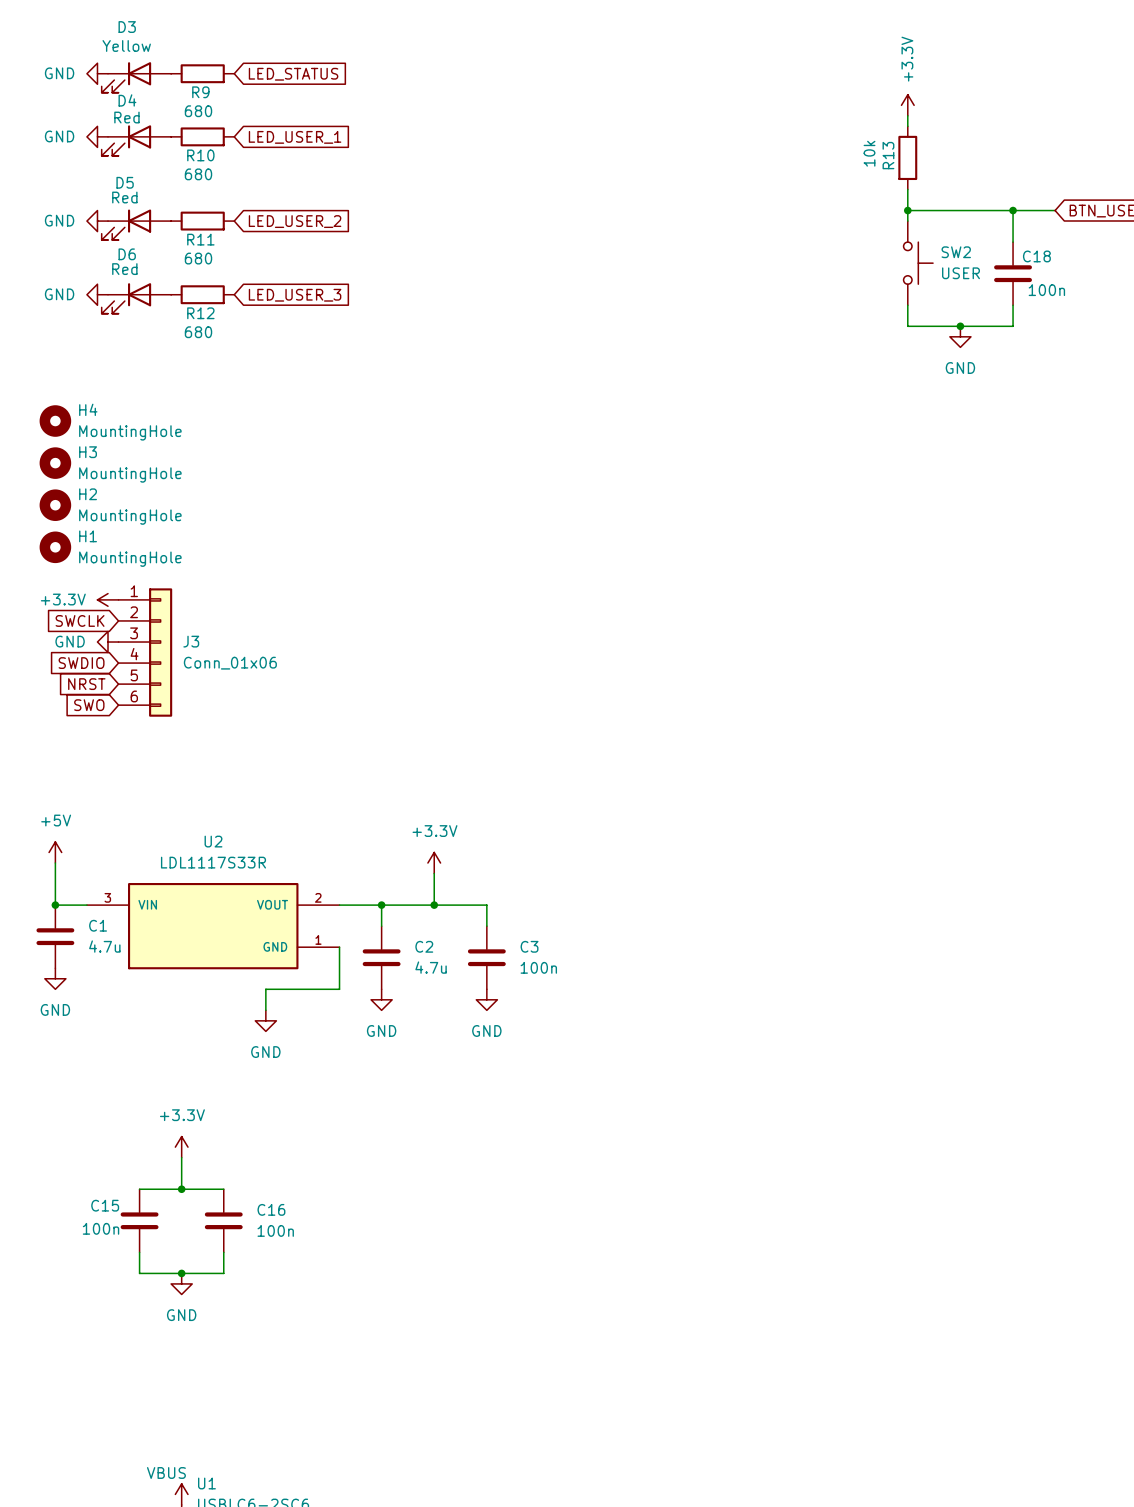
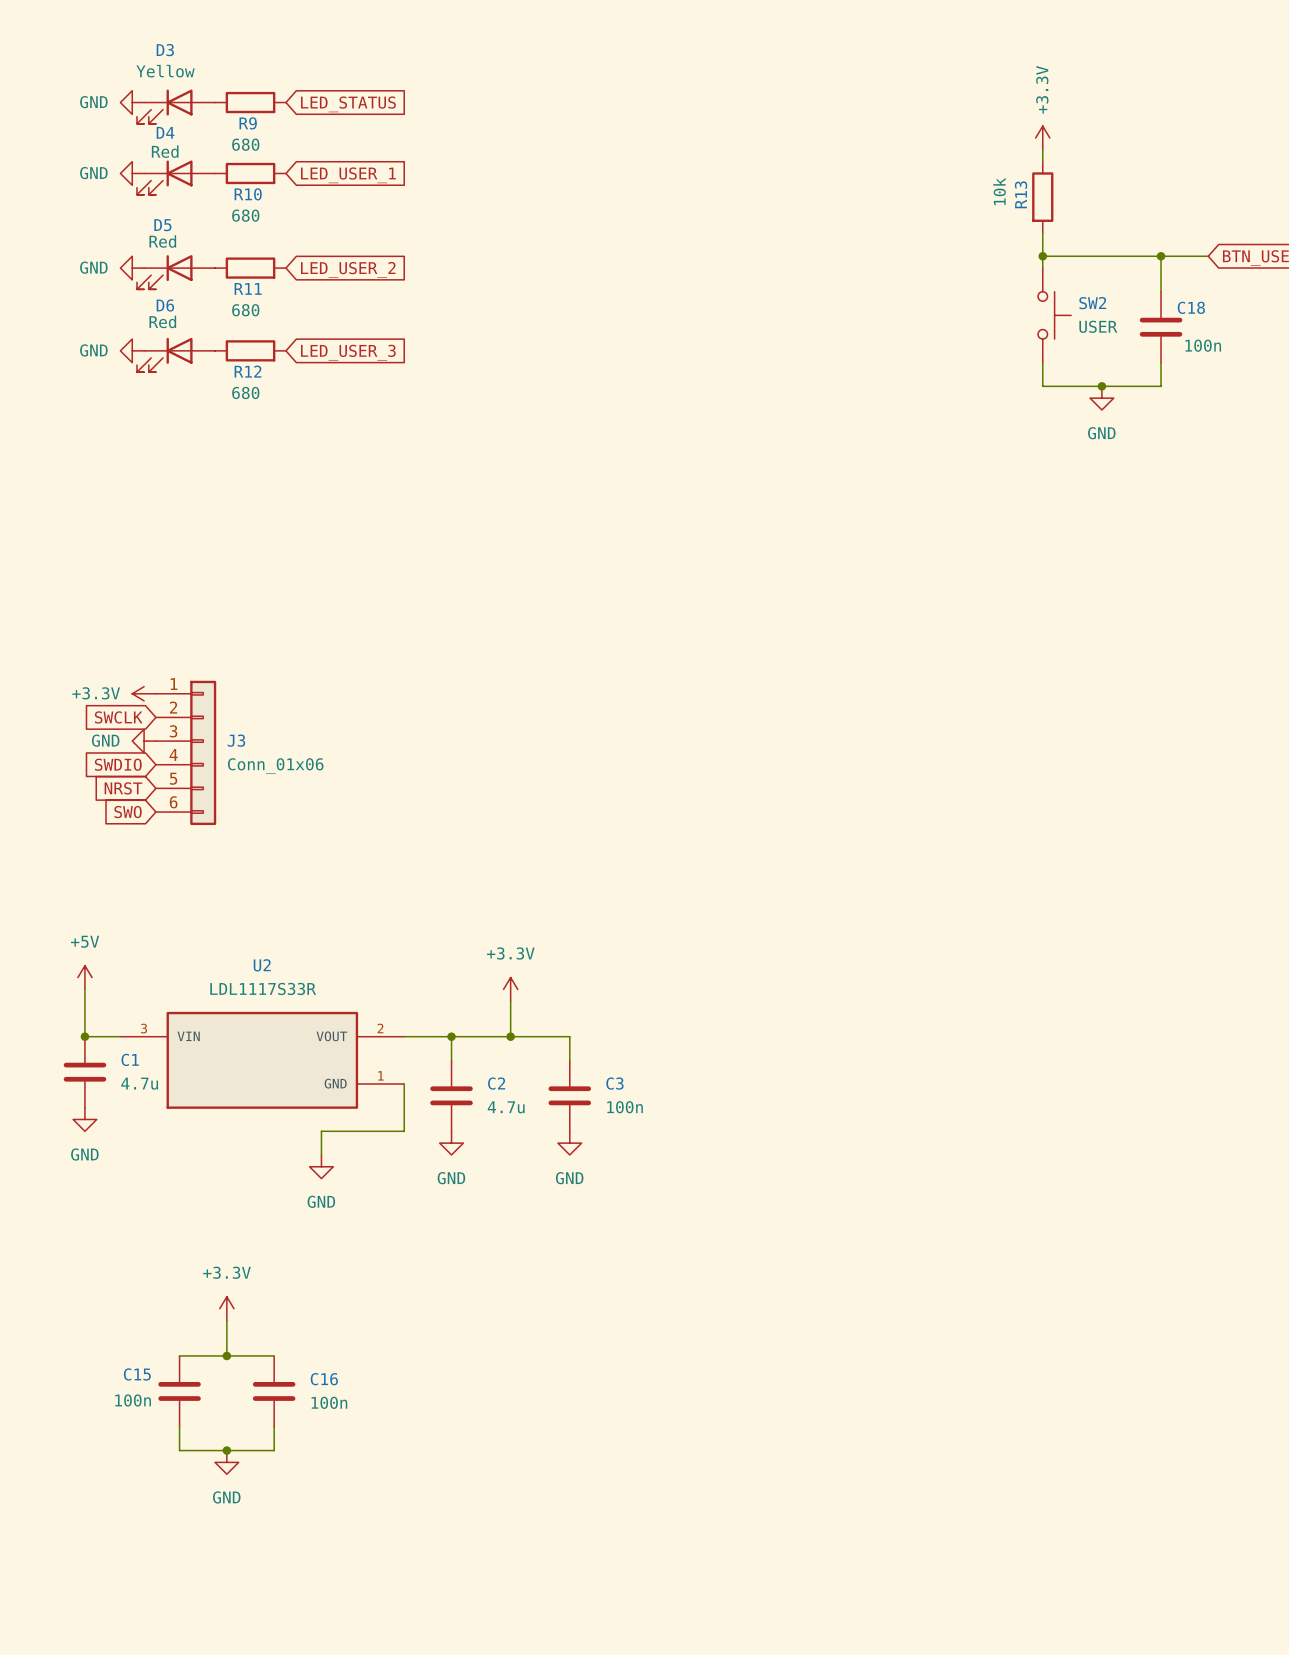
H4: MountingHole (55, 421) -> none
H3: MountingHole (55, 463) -> none
H2: MountingHole (55, 505) -> none
H1: MountingHole (55, 547) -> none

